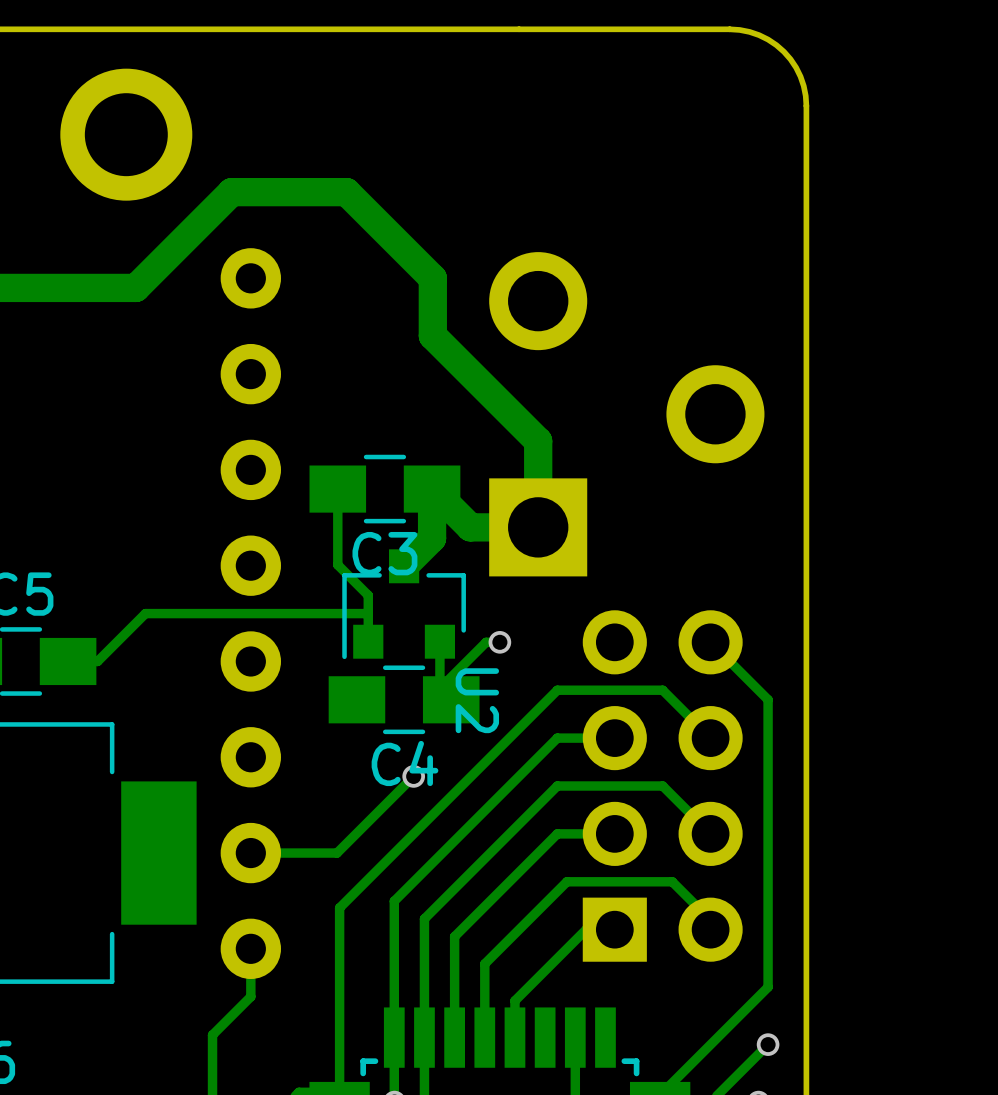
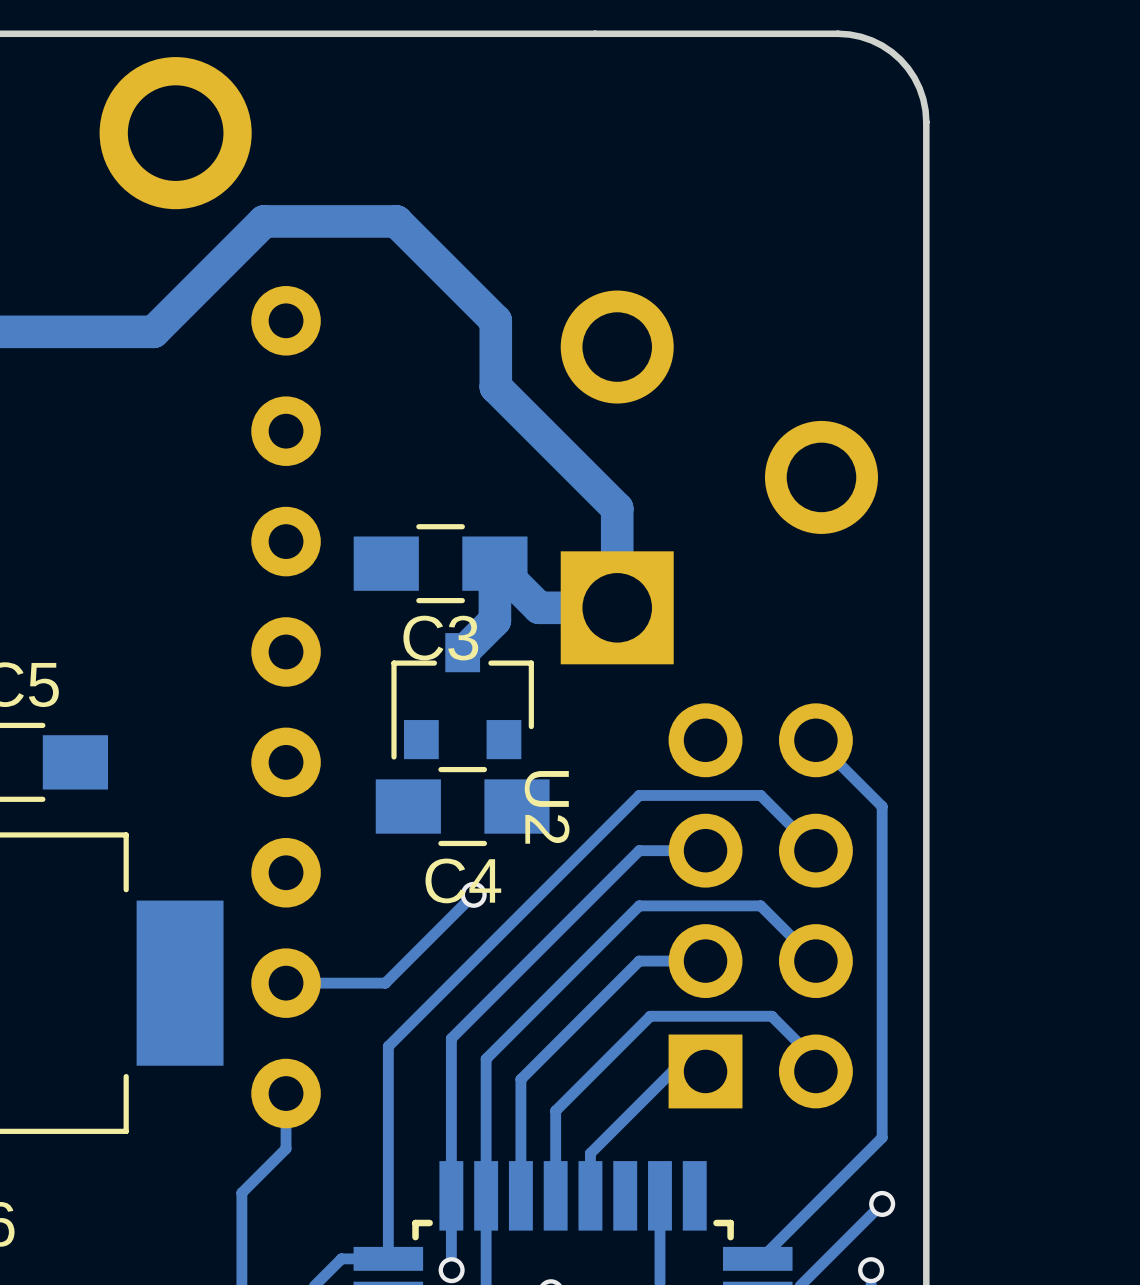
part position: (126, 134) -> (175, 133)
track: (337, 489) (337, 564) (368, 595) (368, 641) -> none
track: (368, 613) (145, 613) (97, 661) (68, 661) -> none
track: (439, 641) (439, 688) (486, 642) (499, 642) -> none
via: (499, 642) -> none

